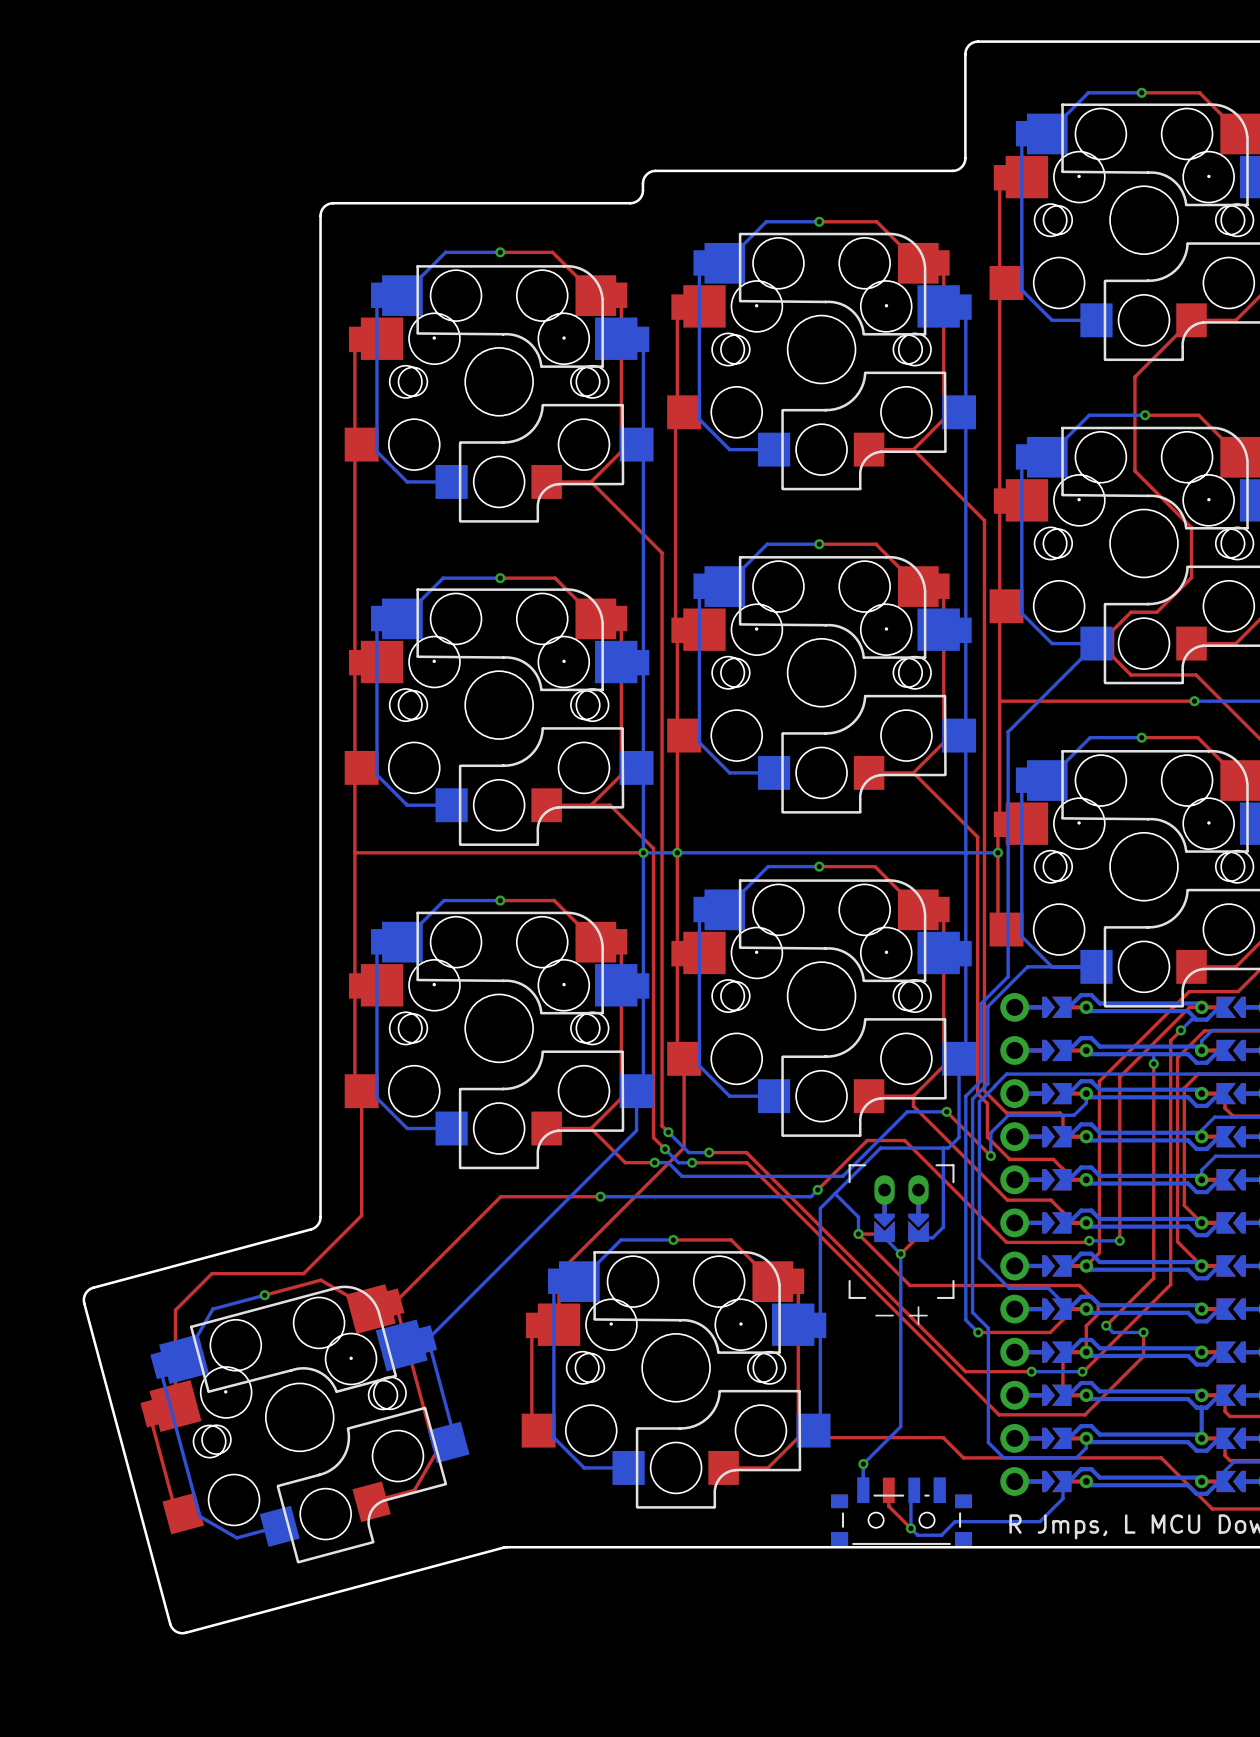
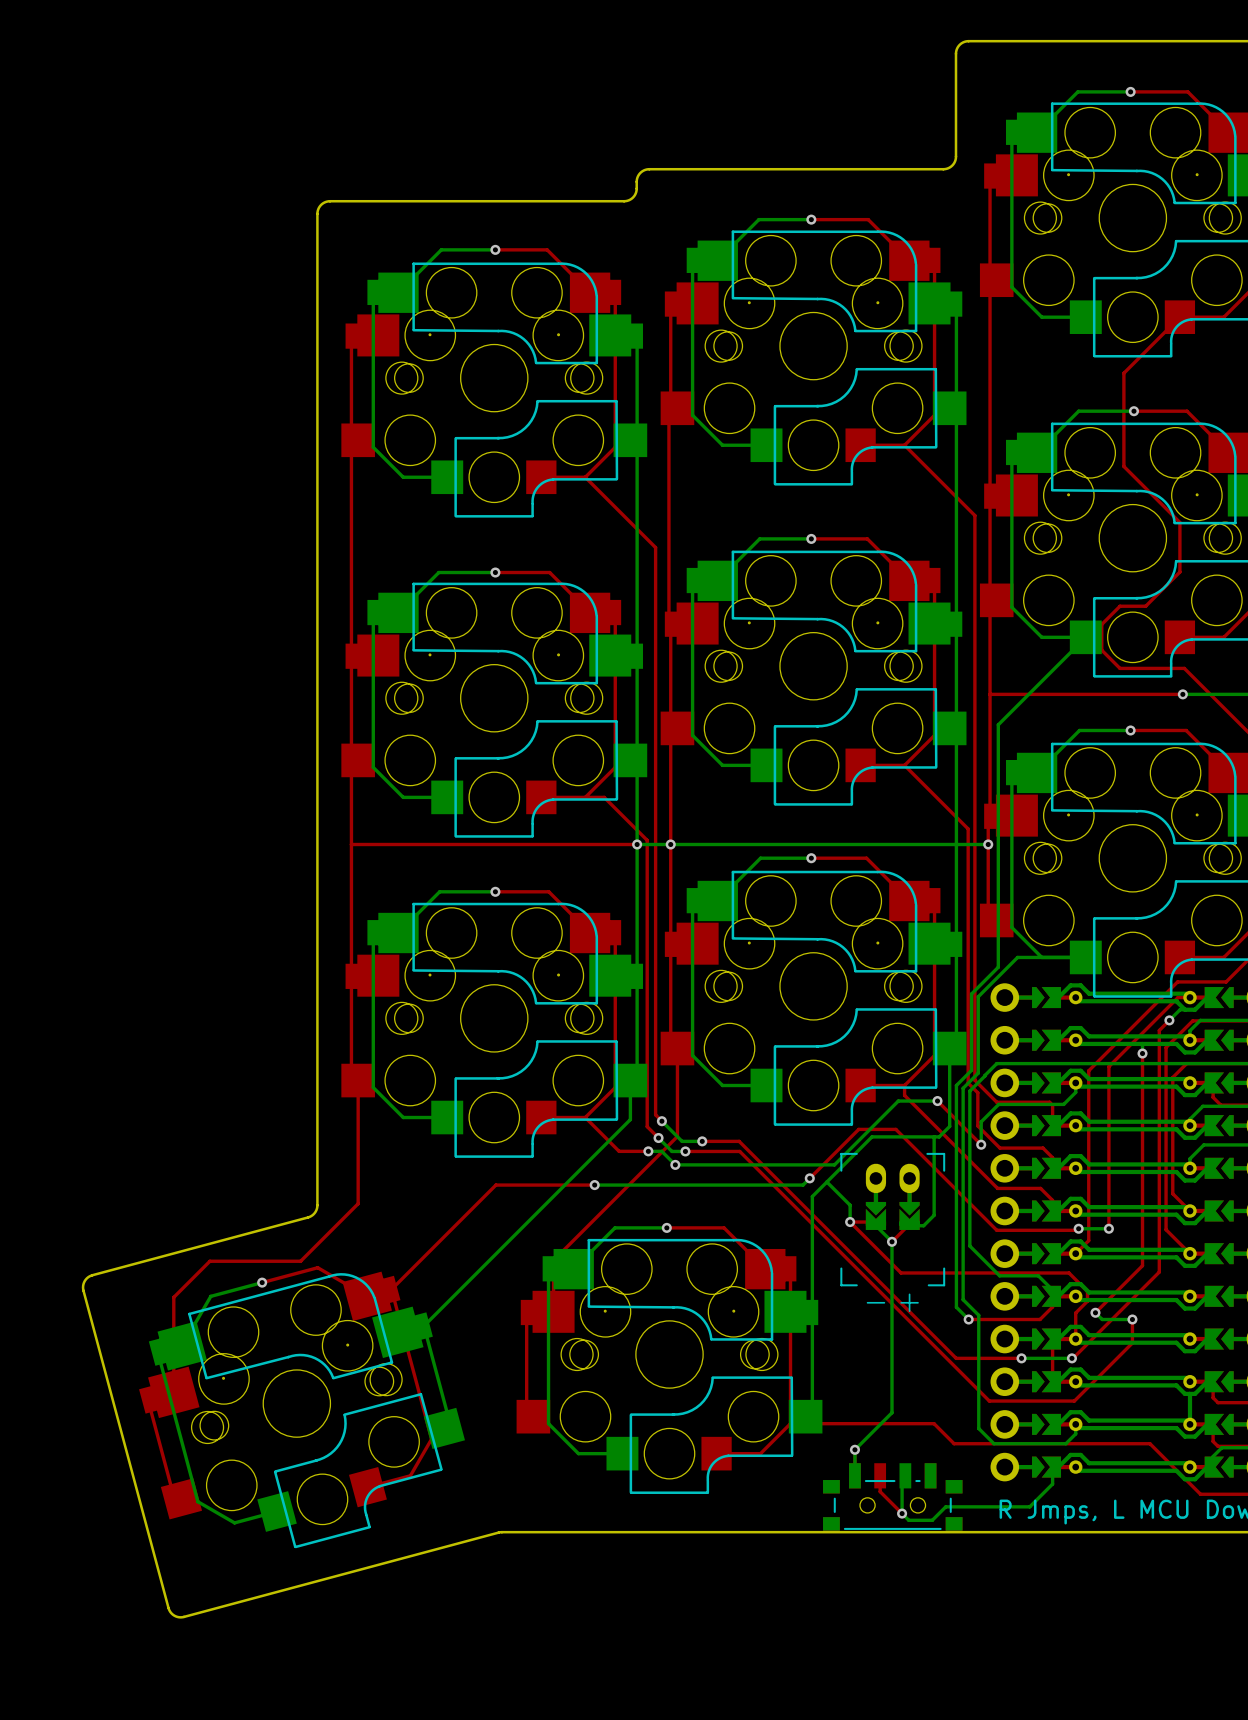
via: none -> (675, 1164)

